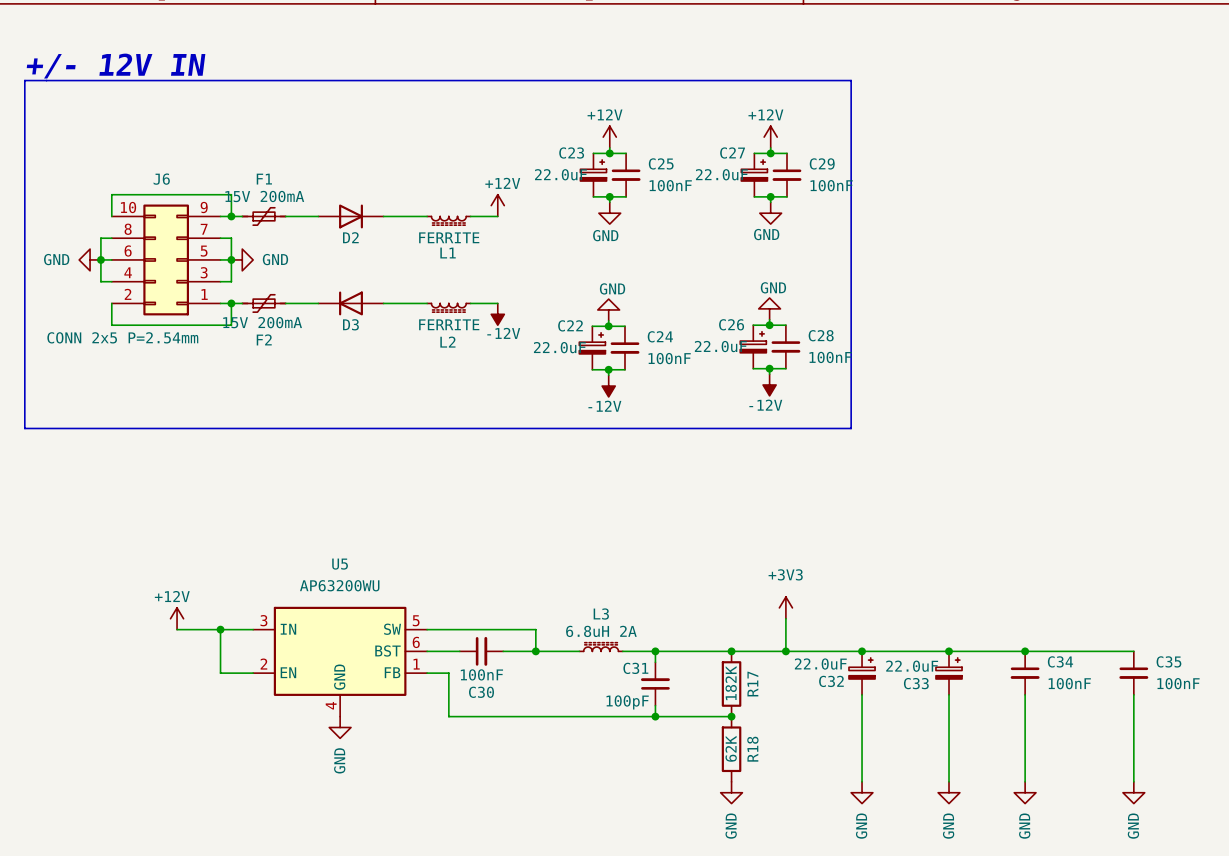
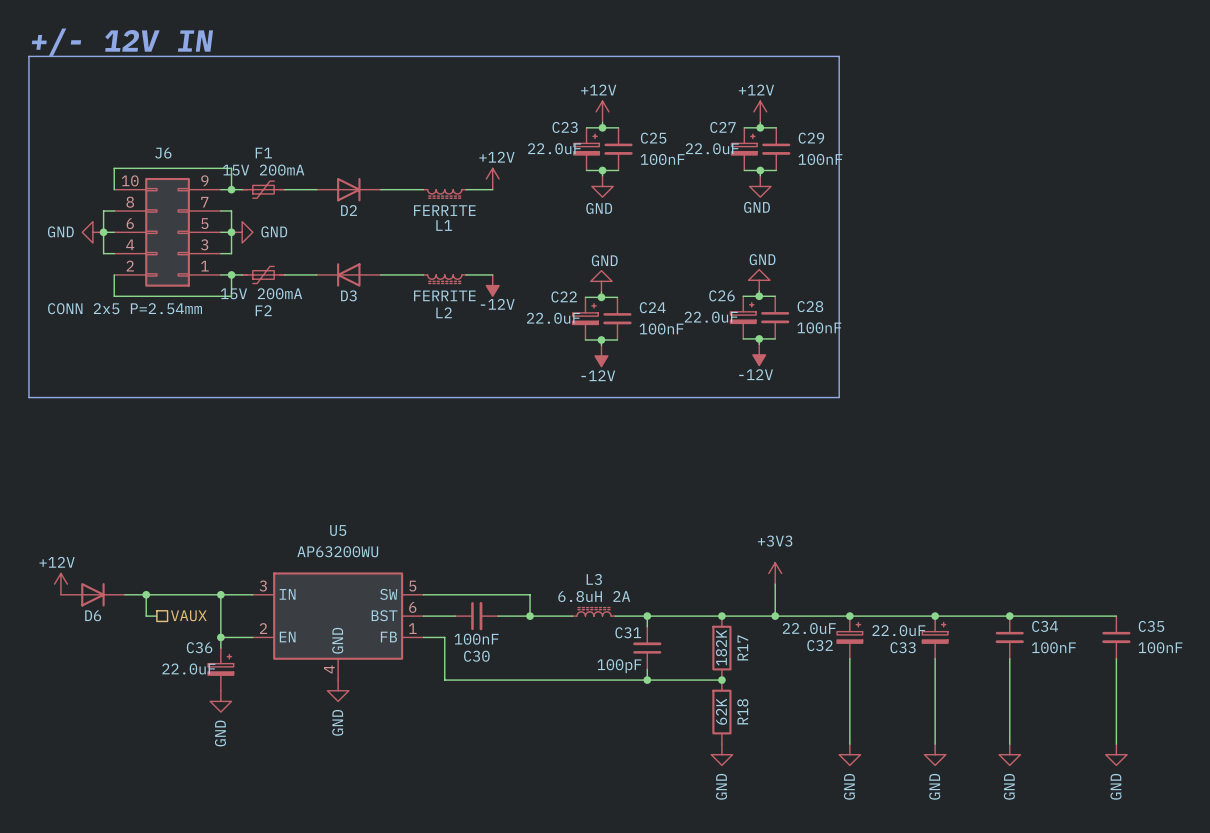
power symbol position: +12V (177, 618) -> +12V (60, 584)
D6: none -> (92, 594)
wire: none -> (124, 594) (178, 594)
wire: none -> (146, 594) (146, 616) (156, 616)
junction: none -> (146, 594)
hierarchical label: none -> VAUX (188, 615)
wire: none -> (220, 637) (220, 648)
junction: none -> (220, 637)
C36: none -> 22.0uF (220, 669)
power symbol: none -> GND (220, 701)

